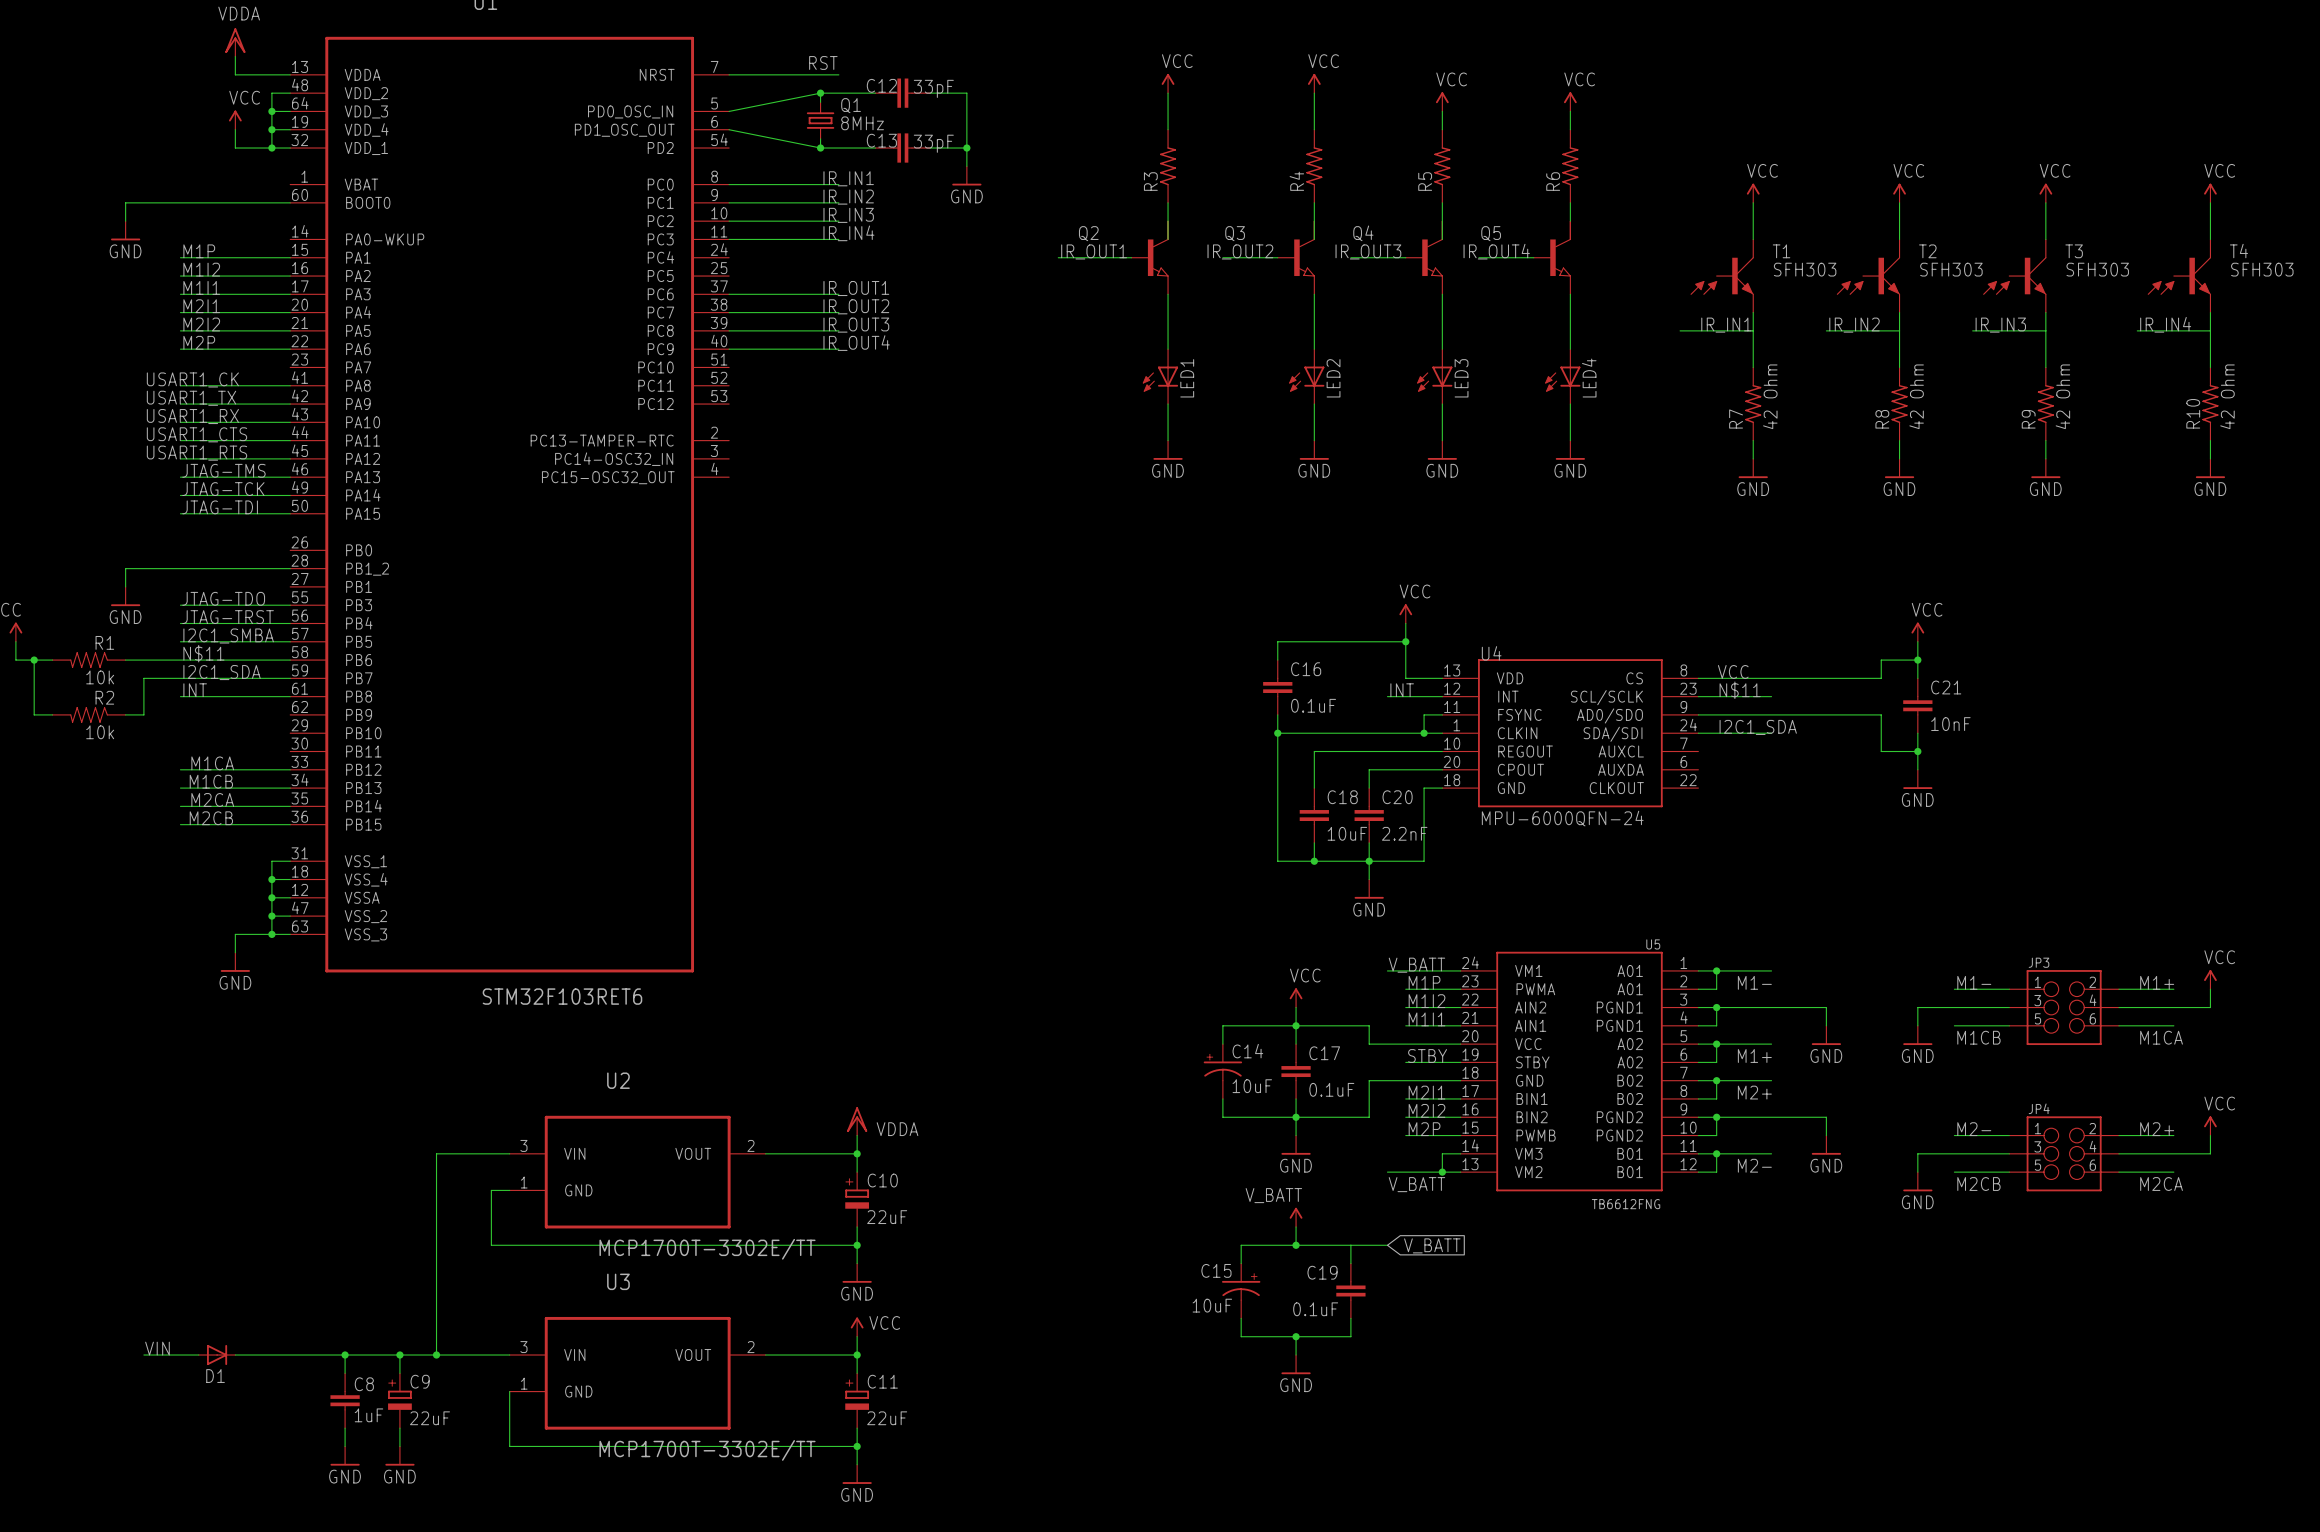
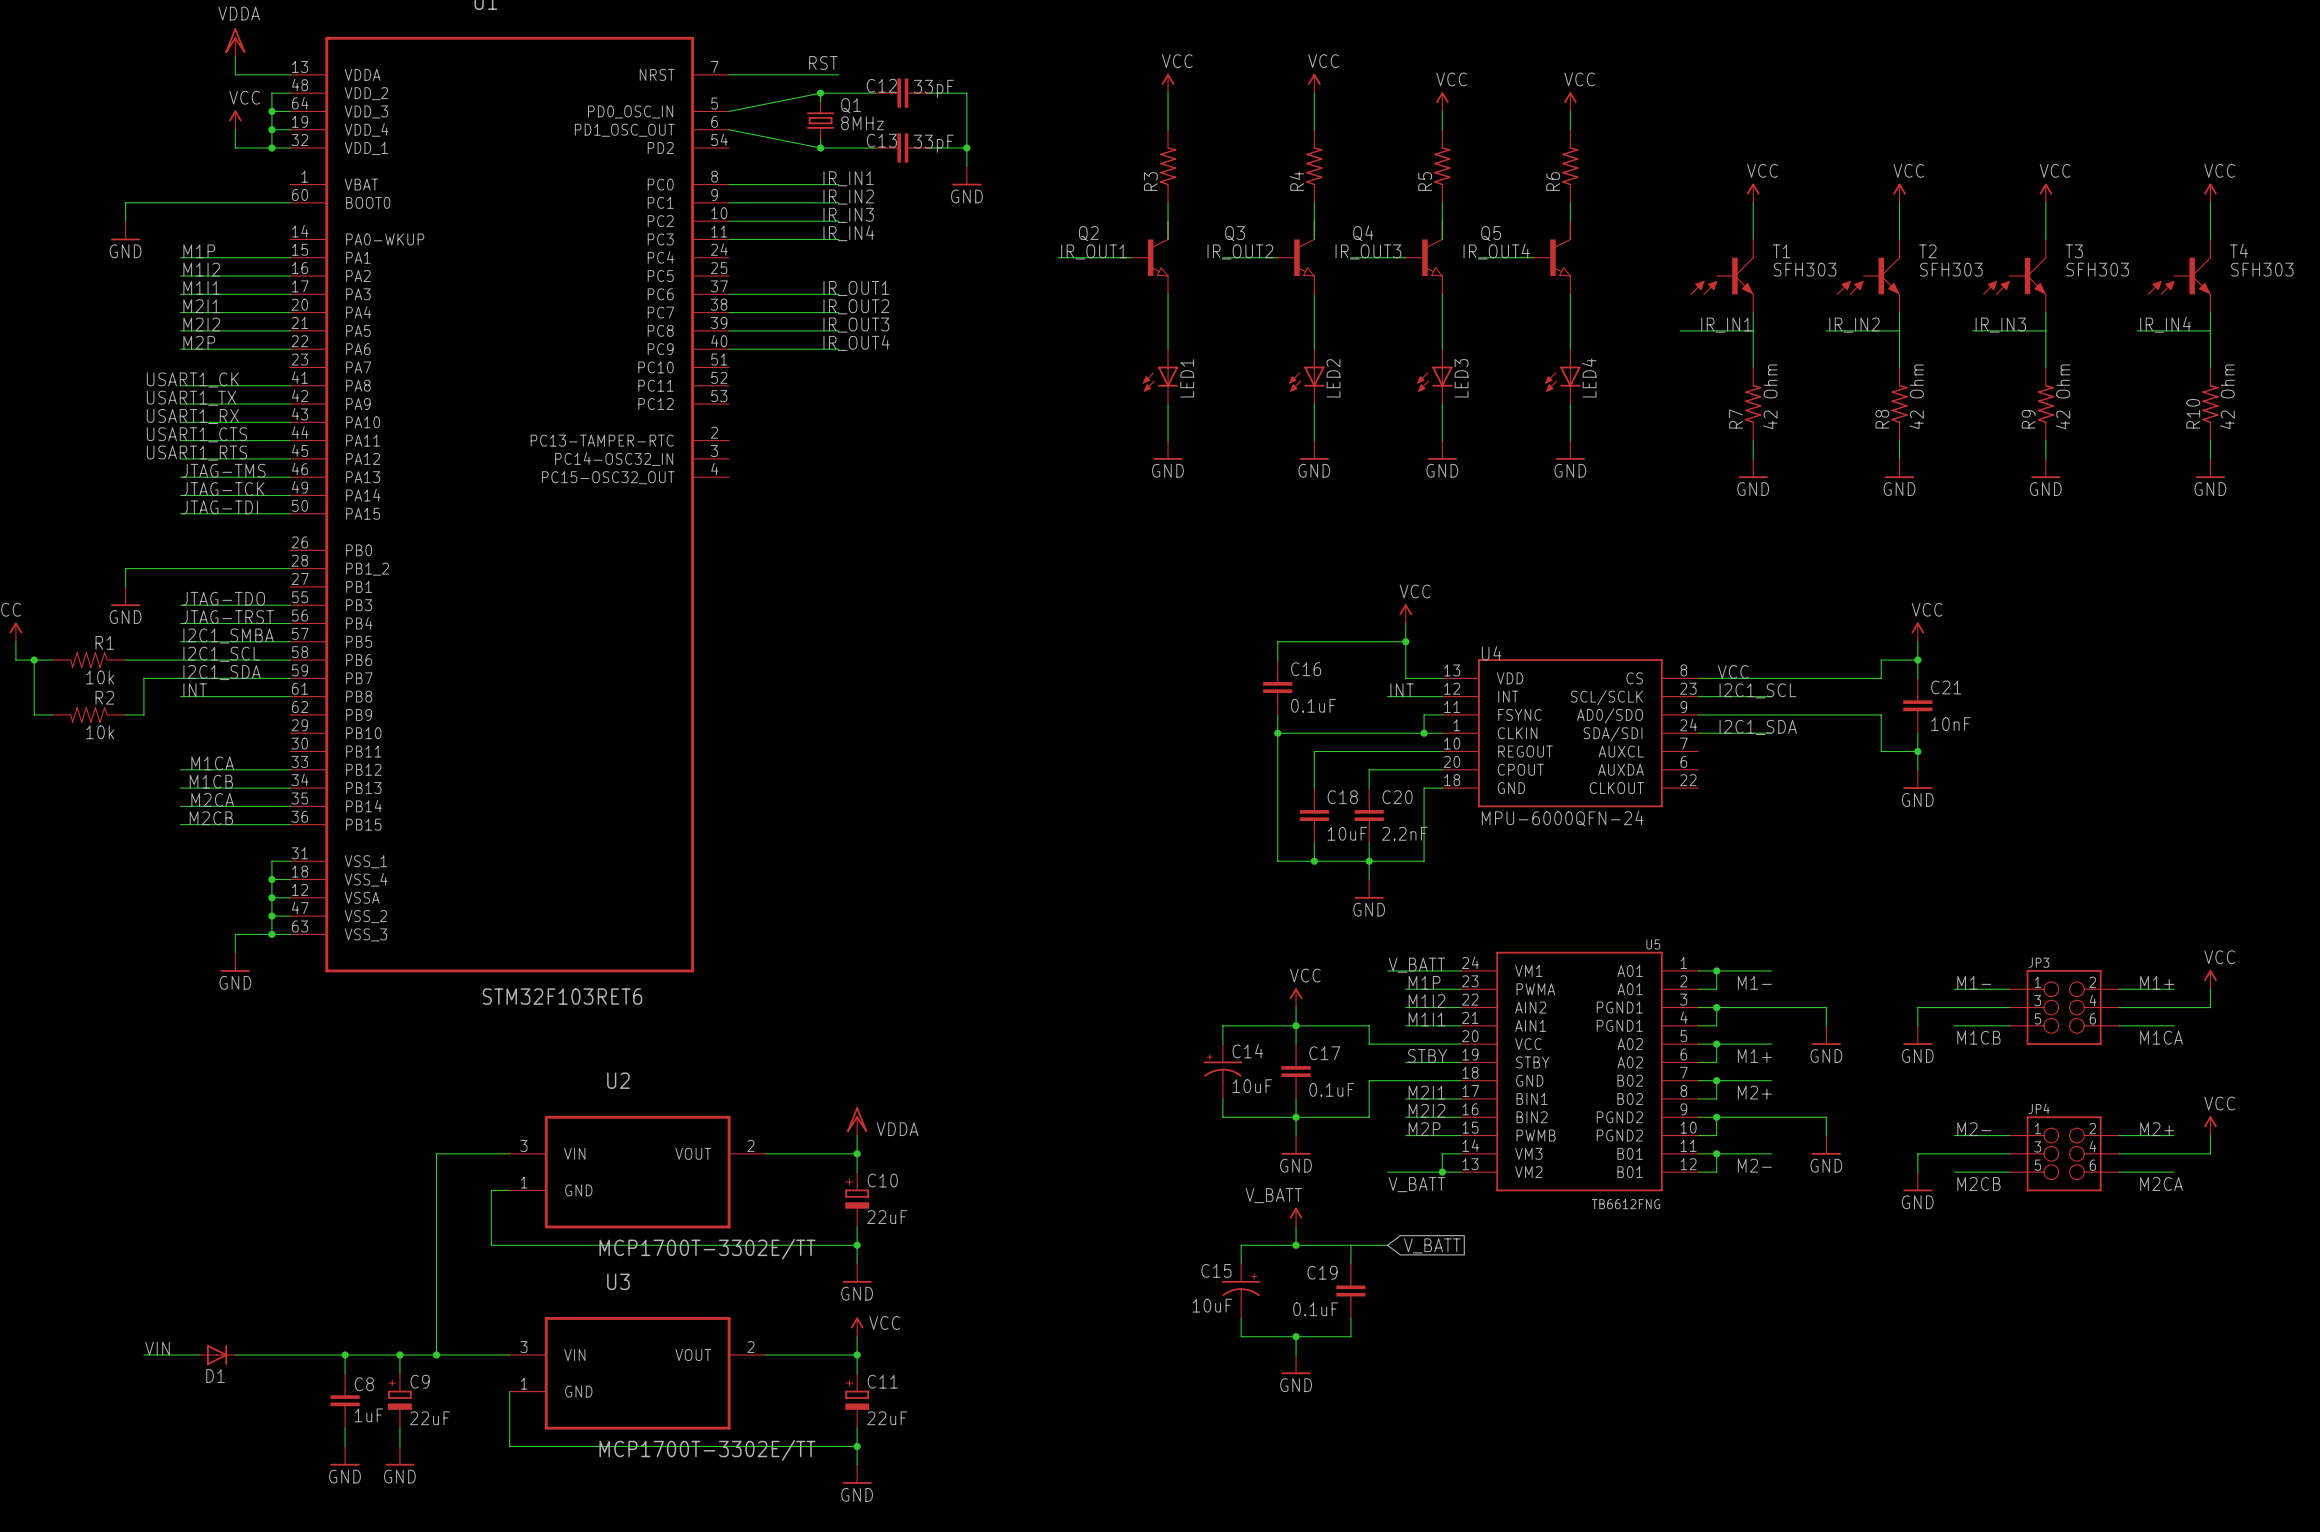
label: N$11 (203, 653) -> I2C1_SCL (221, 654)
label: N$11 (1740, 690) -> I2C1_SCL (1757, 690)

